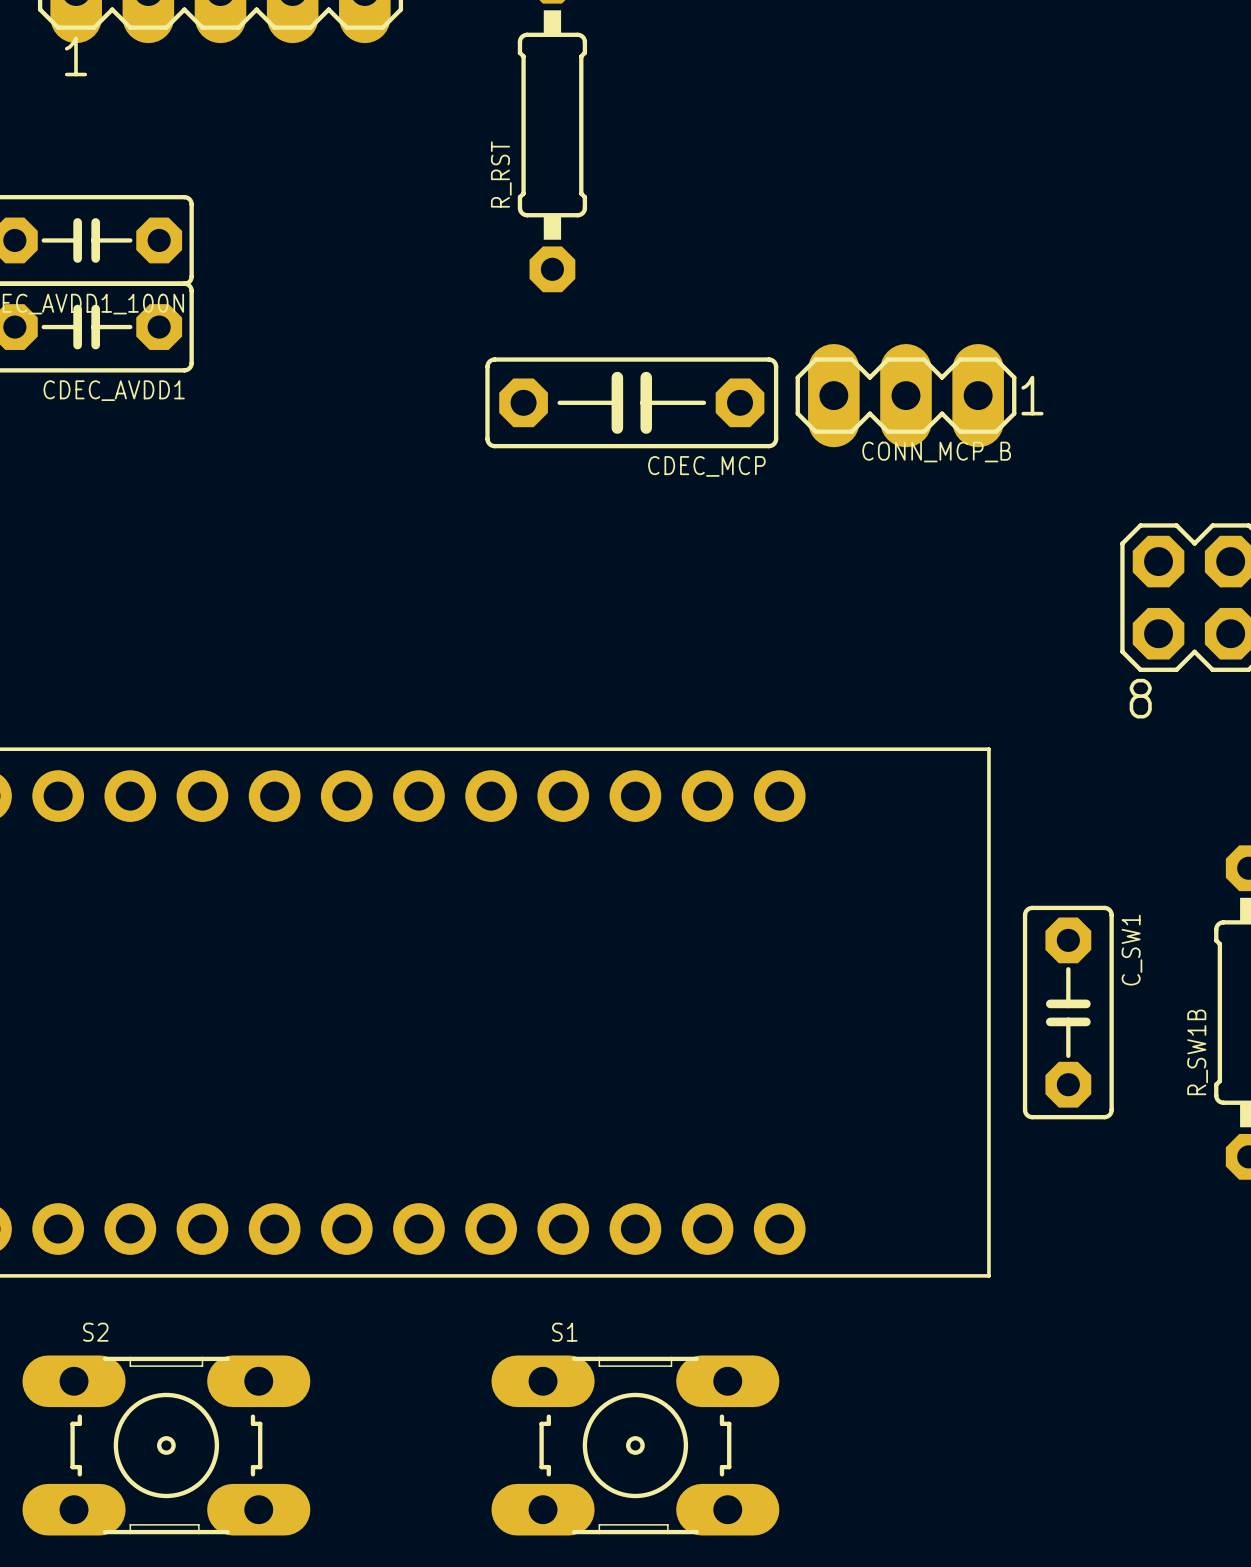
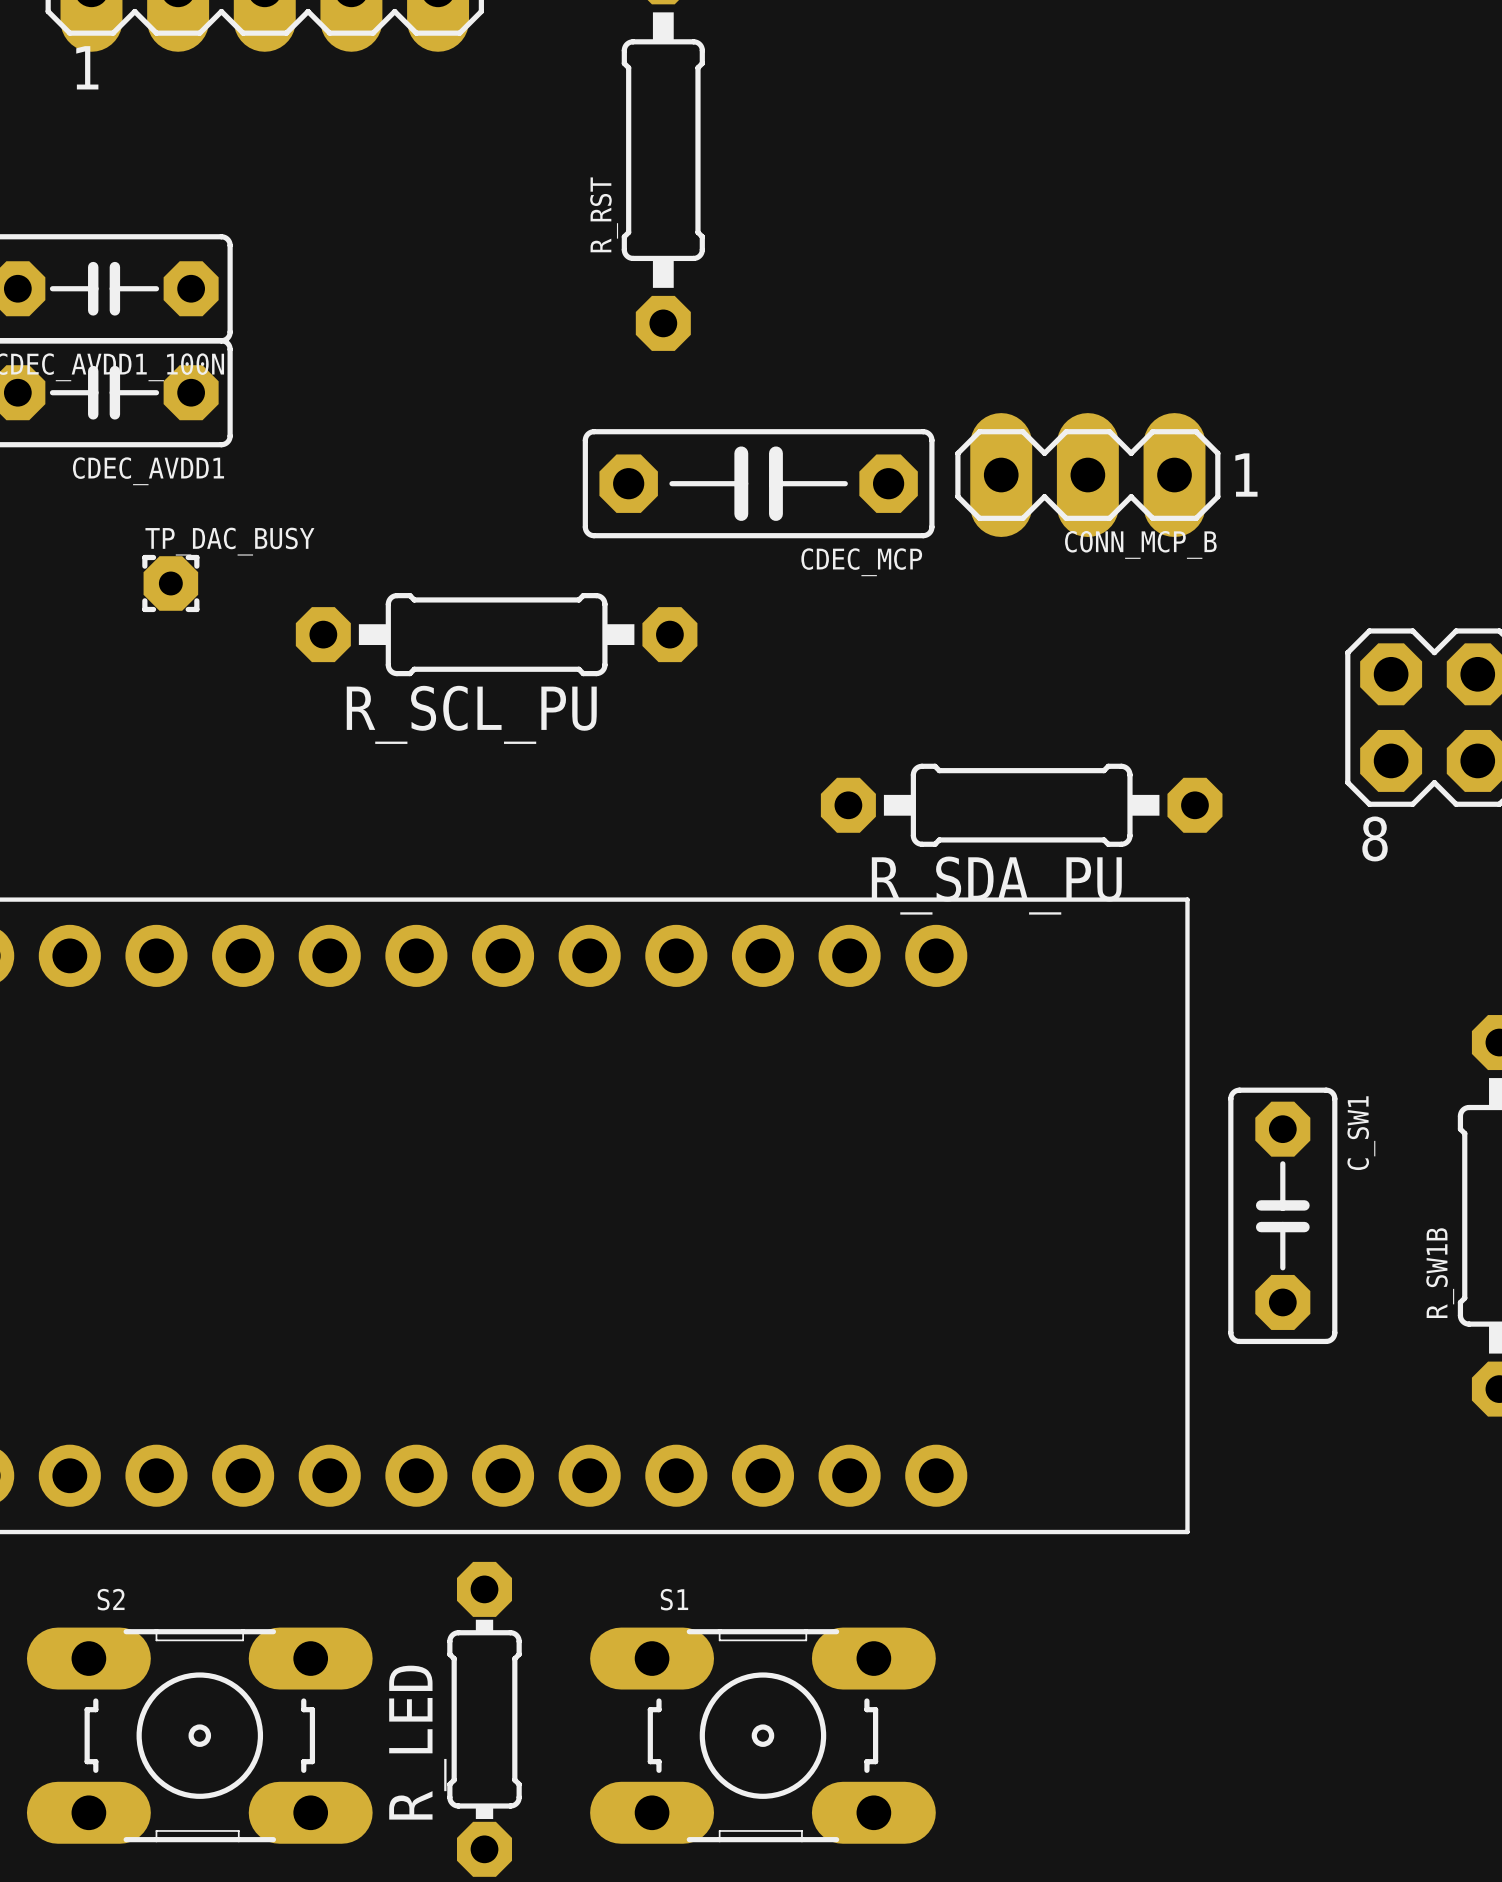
TP_DAC_BUSY: none -> (170, 583)
R_SCL_PU: none -> (496, 634)
R_SDA_PU: none -> (1021, 805)
R_LED: none -> (484, 1719)

